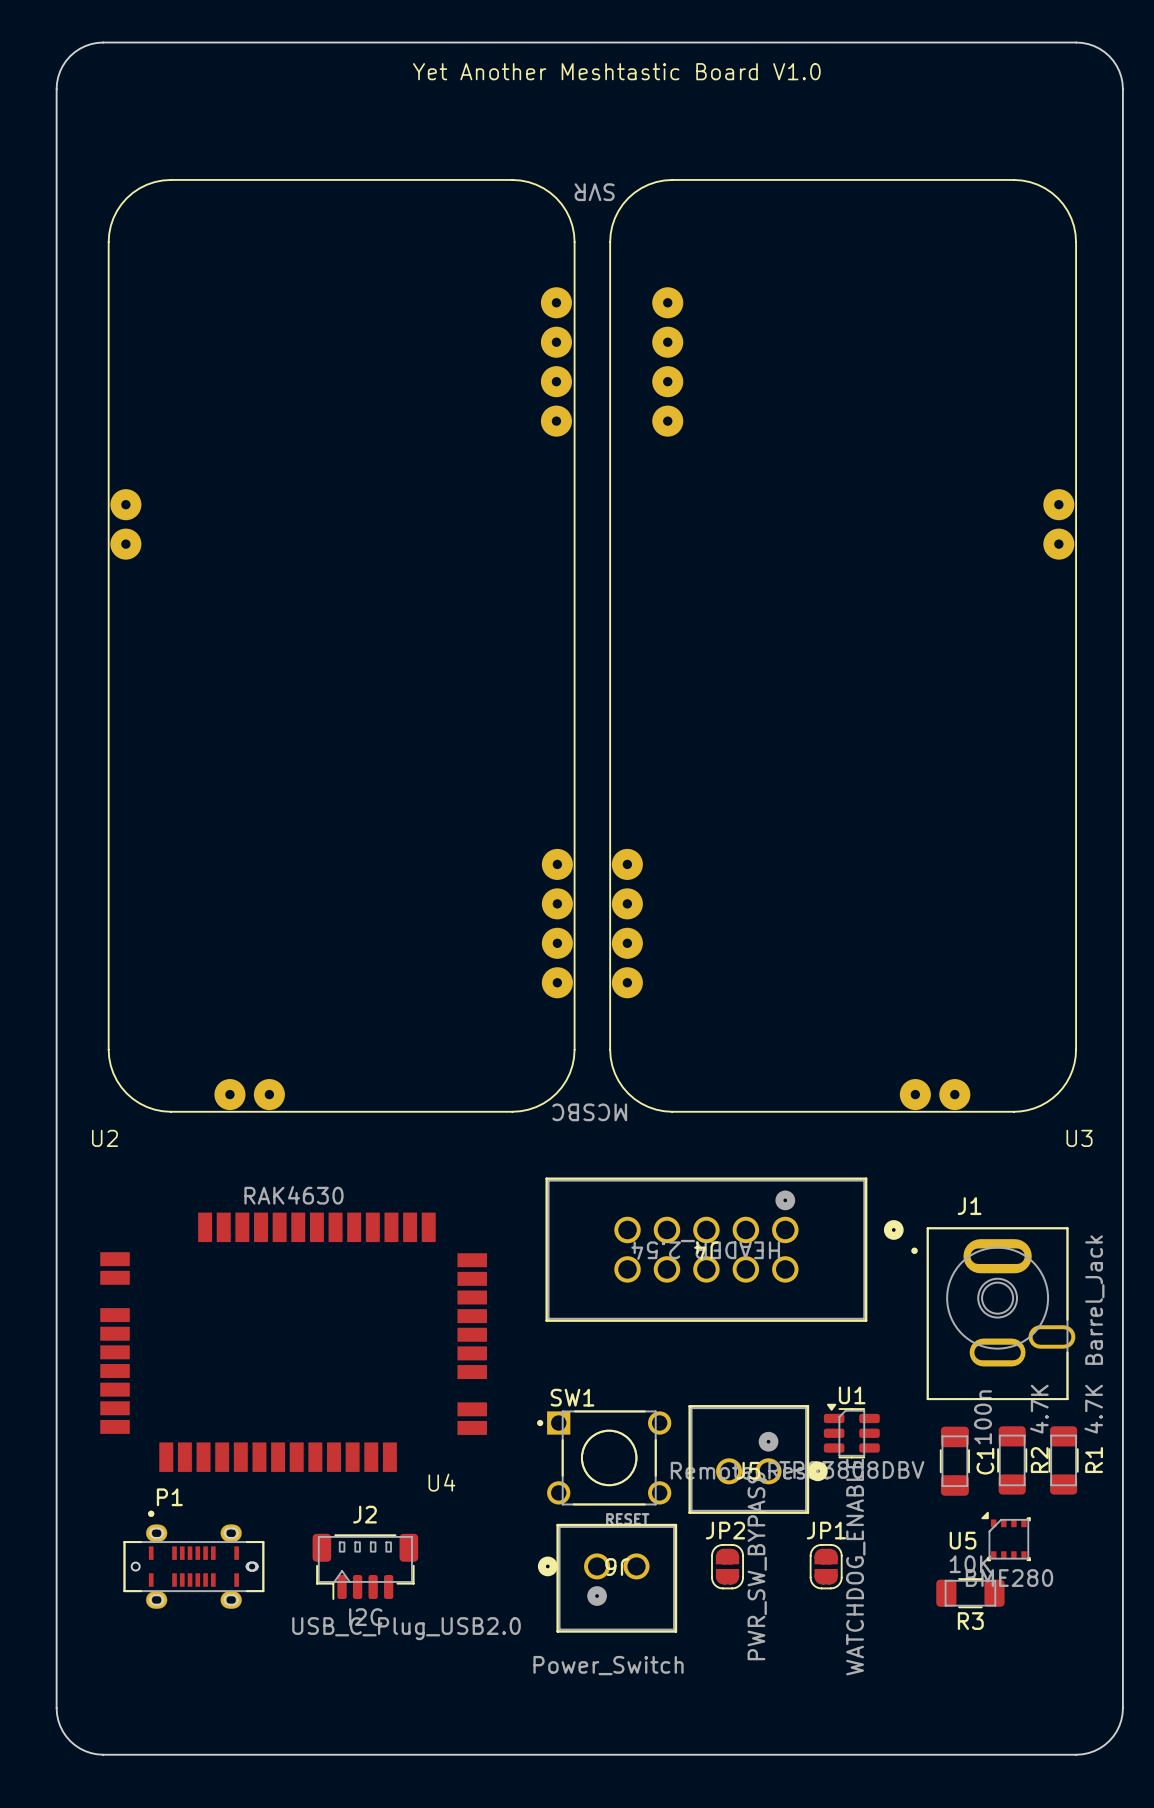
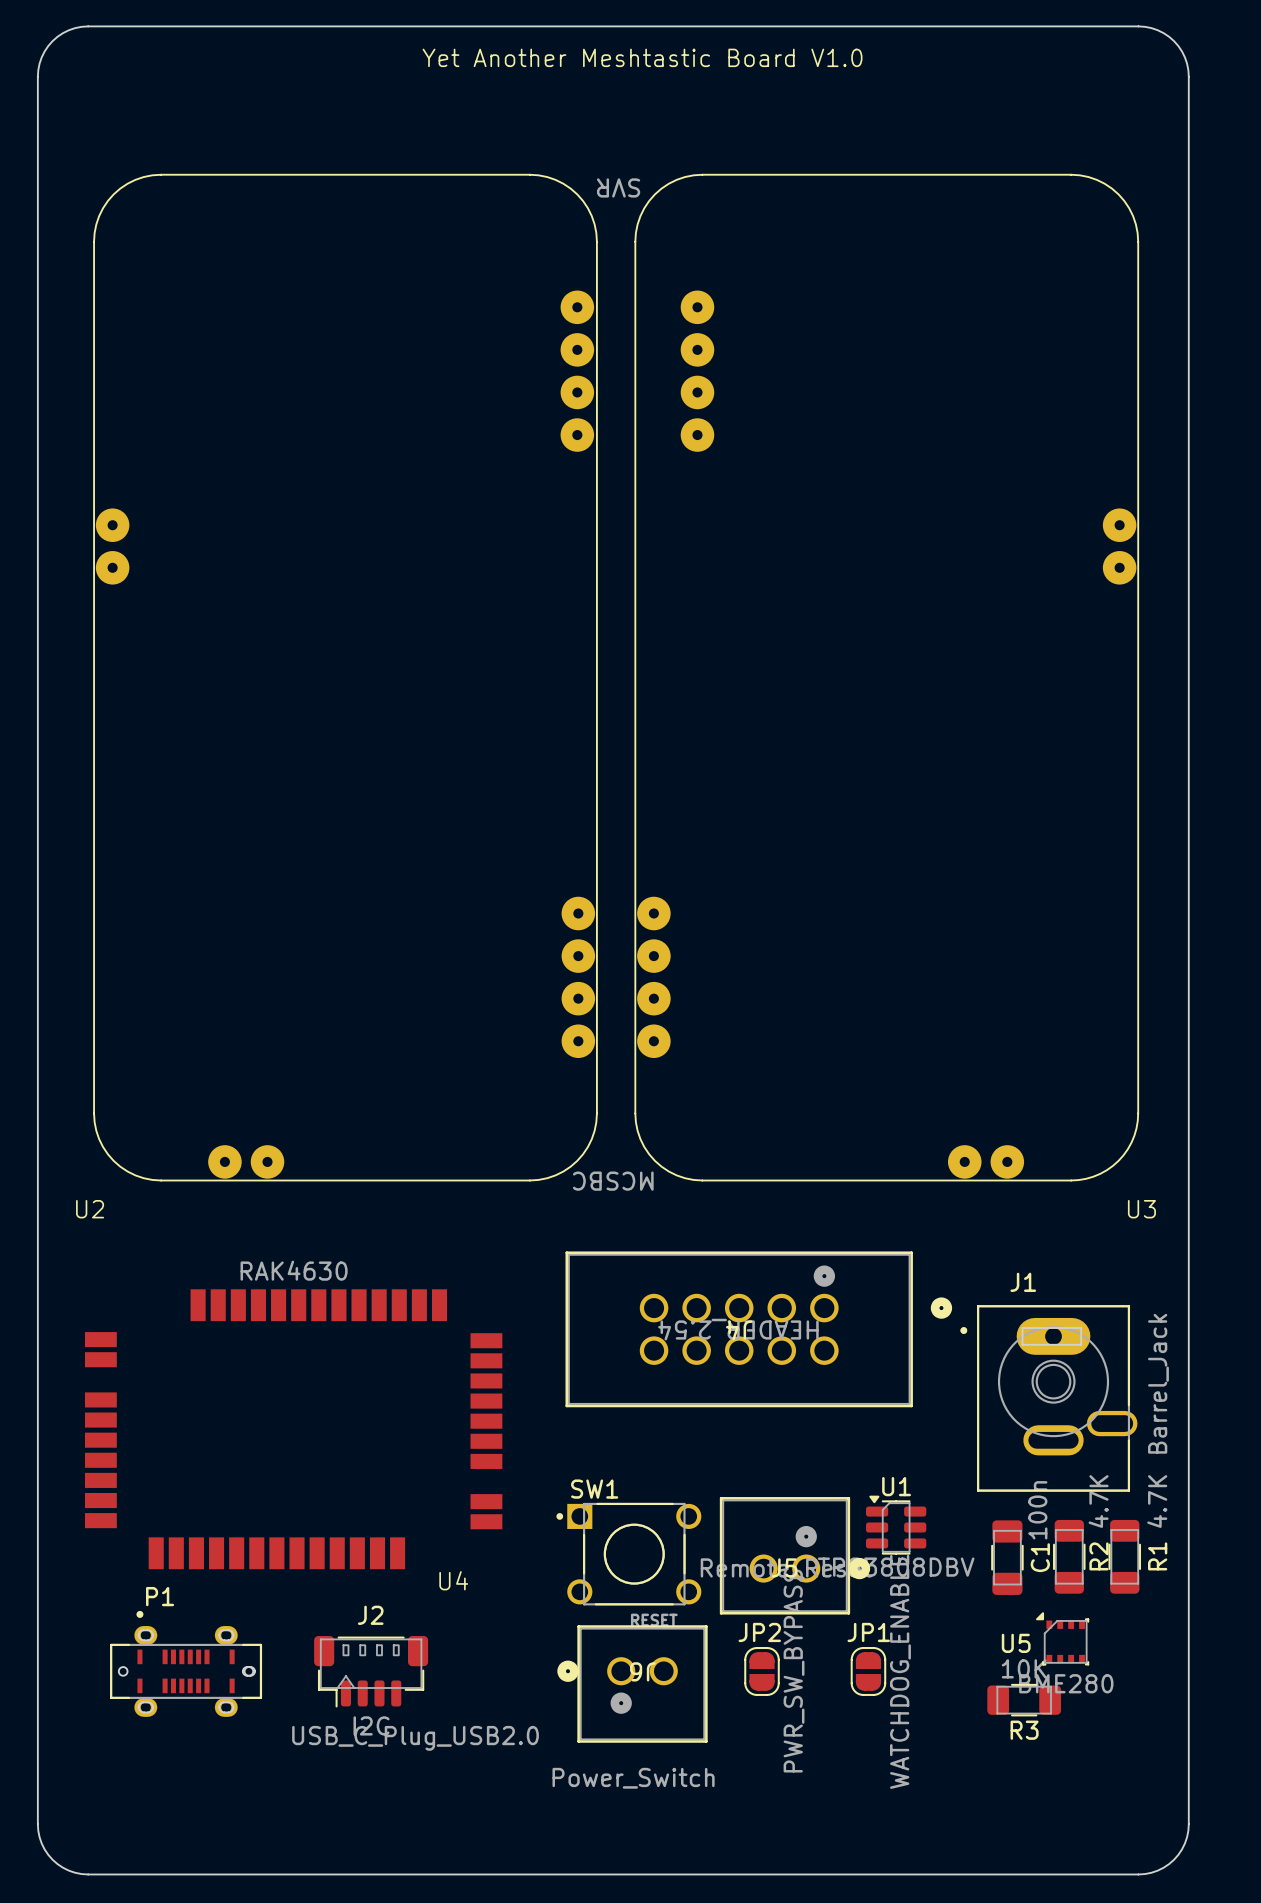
J1 footprint: [911, 1227, 1076, 1401] -> [960, 1305, 1138, 1492]

